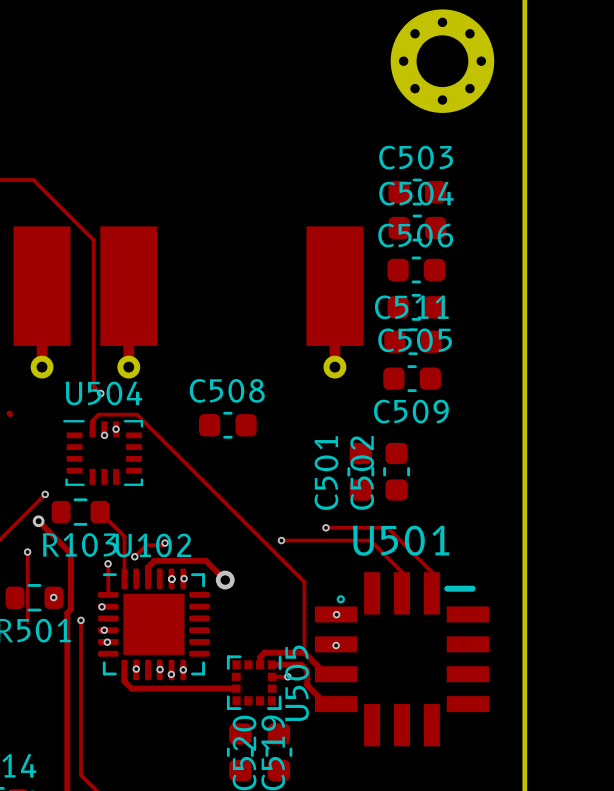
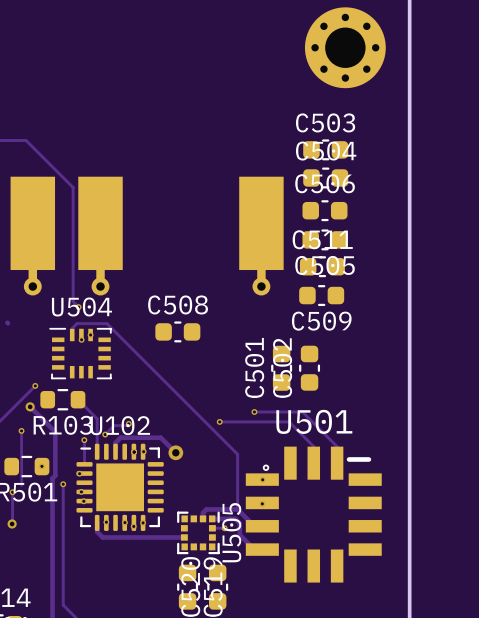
track: none -> (12, 492) (12, 523)
via: none -> (12, 492)
via: none -> (12, 523)

